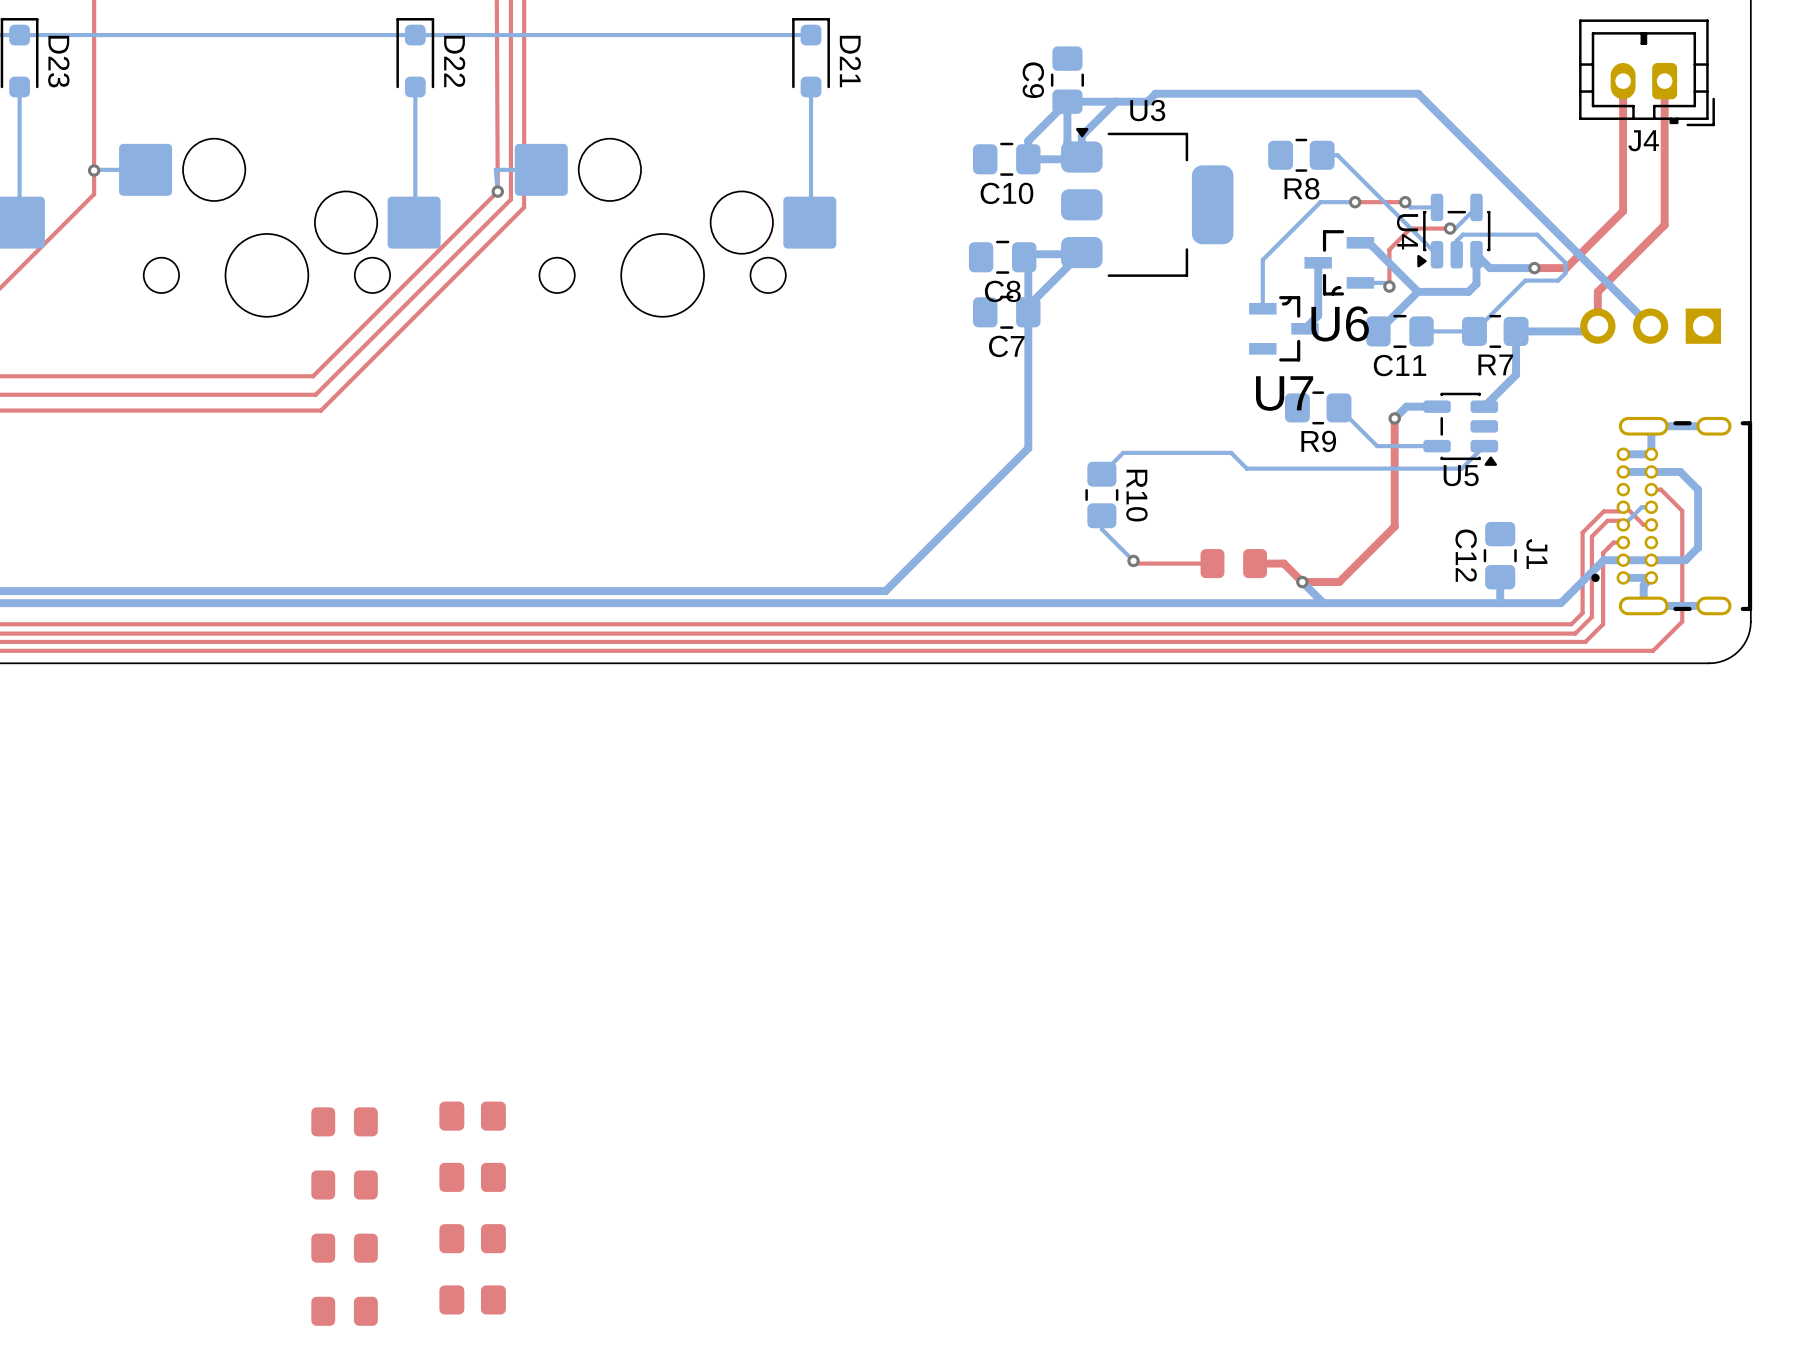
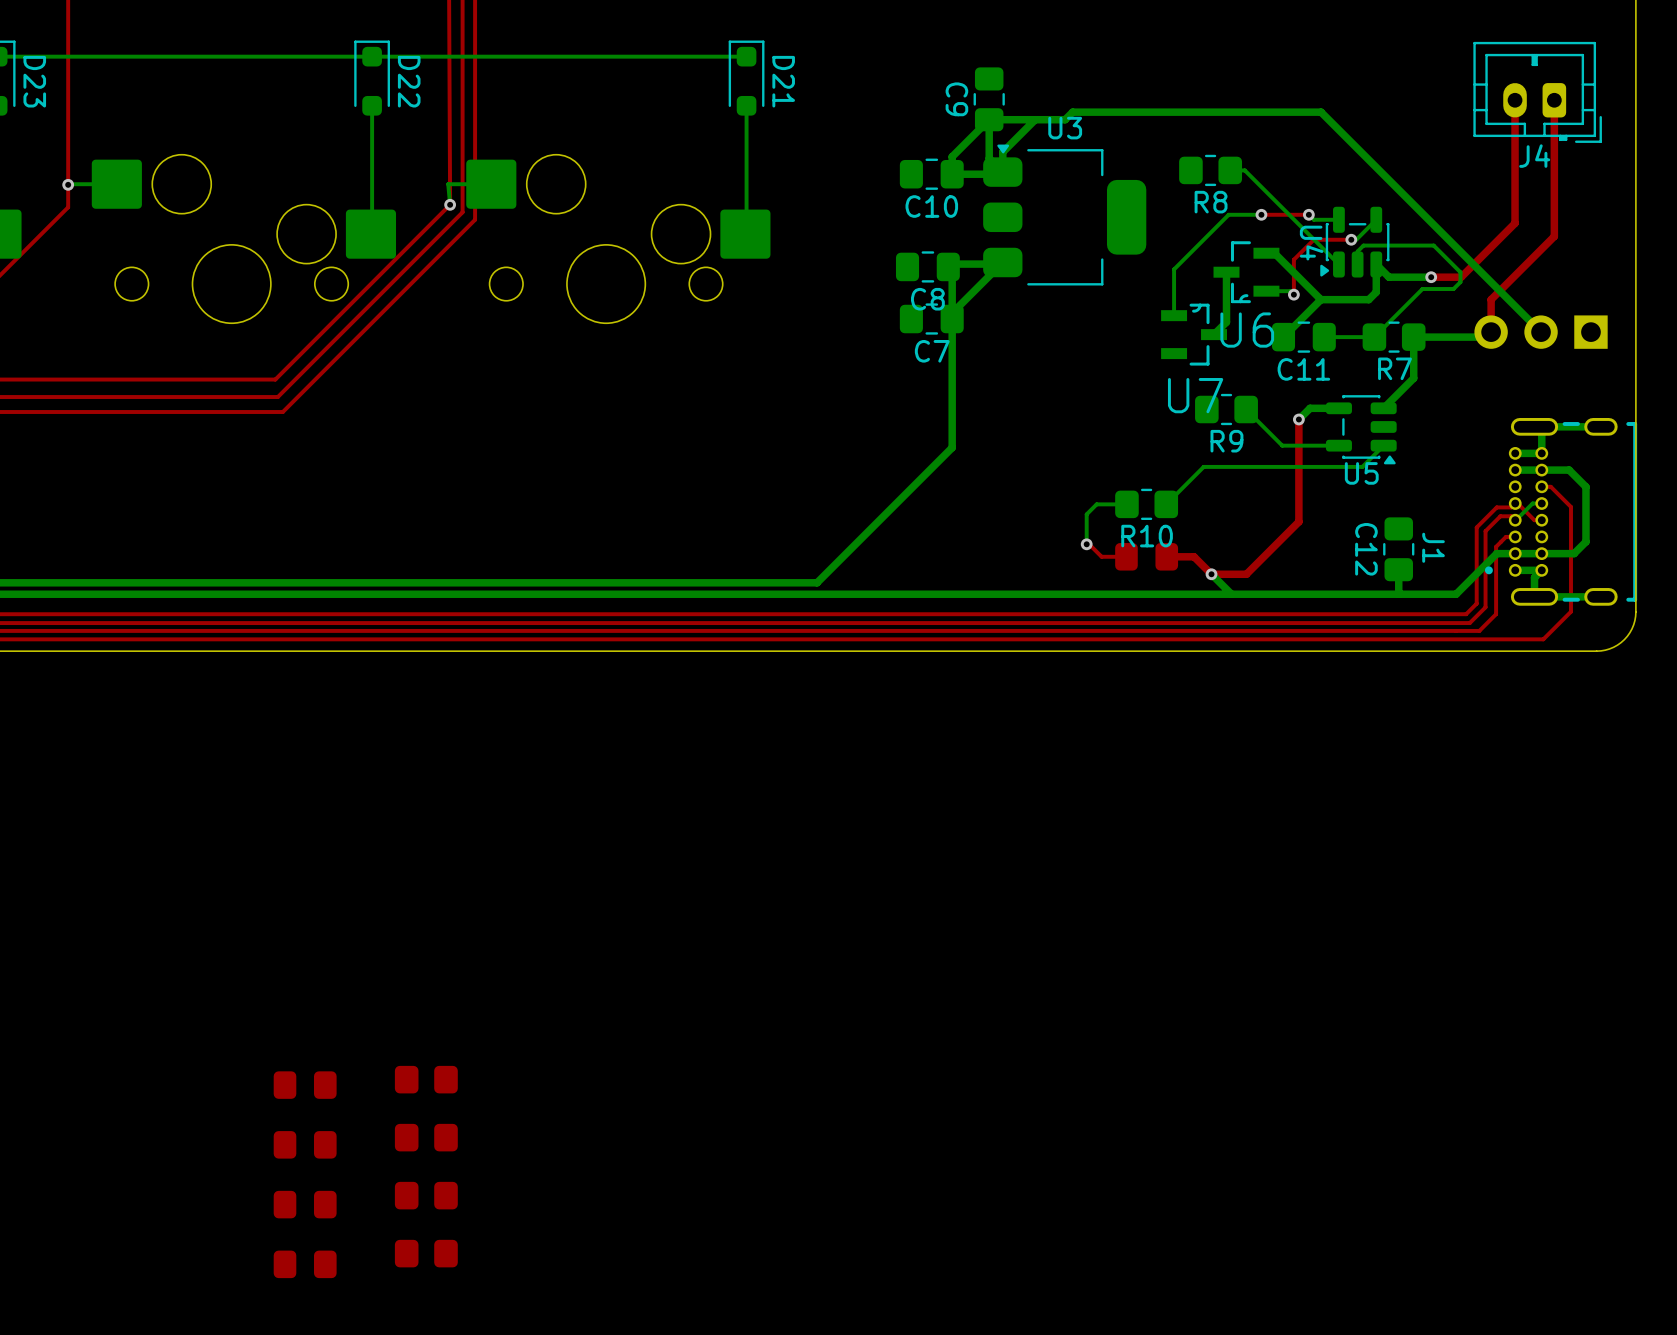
bottom track: (1294, 468) (1246, 468) (1231, 452) (1123, 452) (1101, 474) -> (1203, 466) (1166, 504)
R10 rotation: 0° (1101, 494) -> 90° clockwise (1146, 504)
R10 position: (1101, 494) -> (1146, 504)
bottom track: none -> (1126, 504) (1096, 504) (1086, 514) (1086, 544)
bottom track: (1101, 515) (1101, 529) (1133, 560) -> none
top track: (1133, 560) (1136, 563) (1186, 563) -> (1086, 544) (1089, 544) (1101, 556)
via position: (1133, 560) -> (1086, 544)

